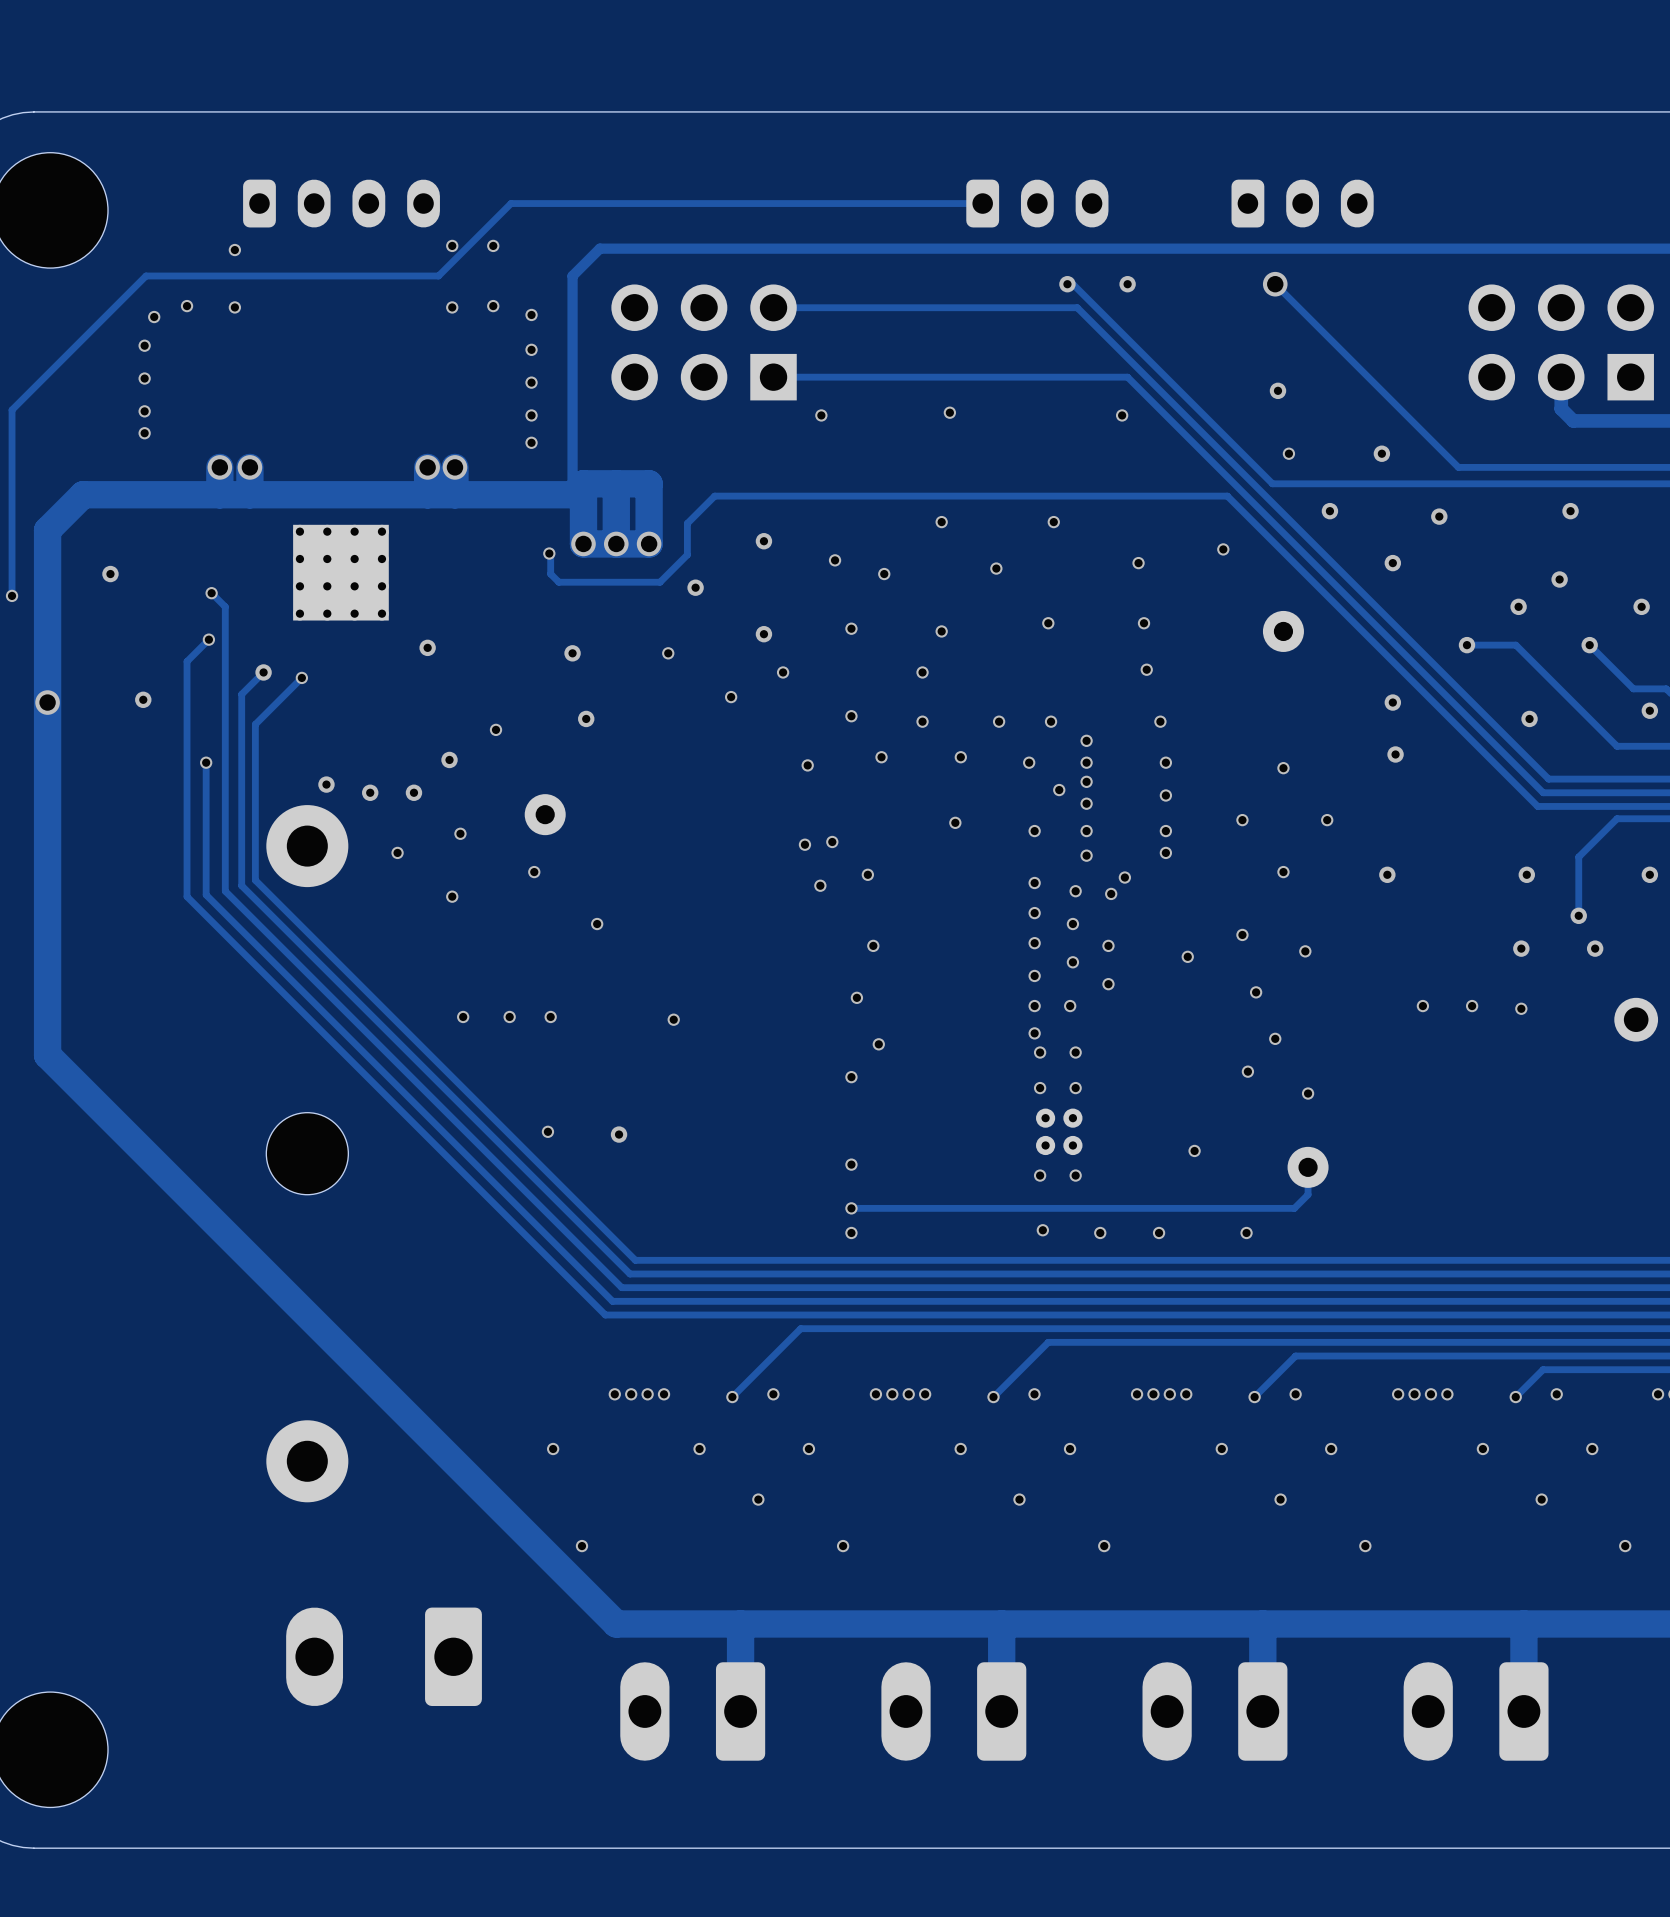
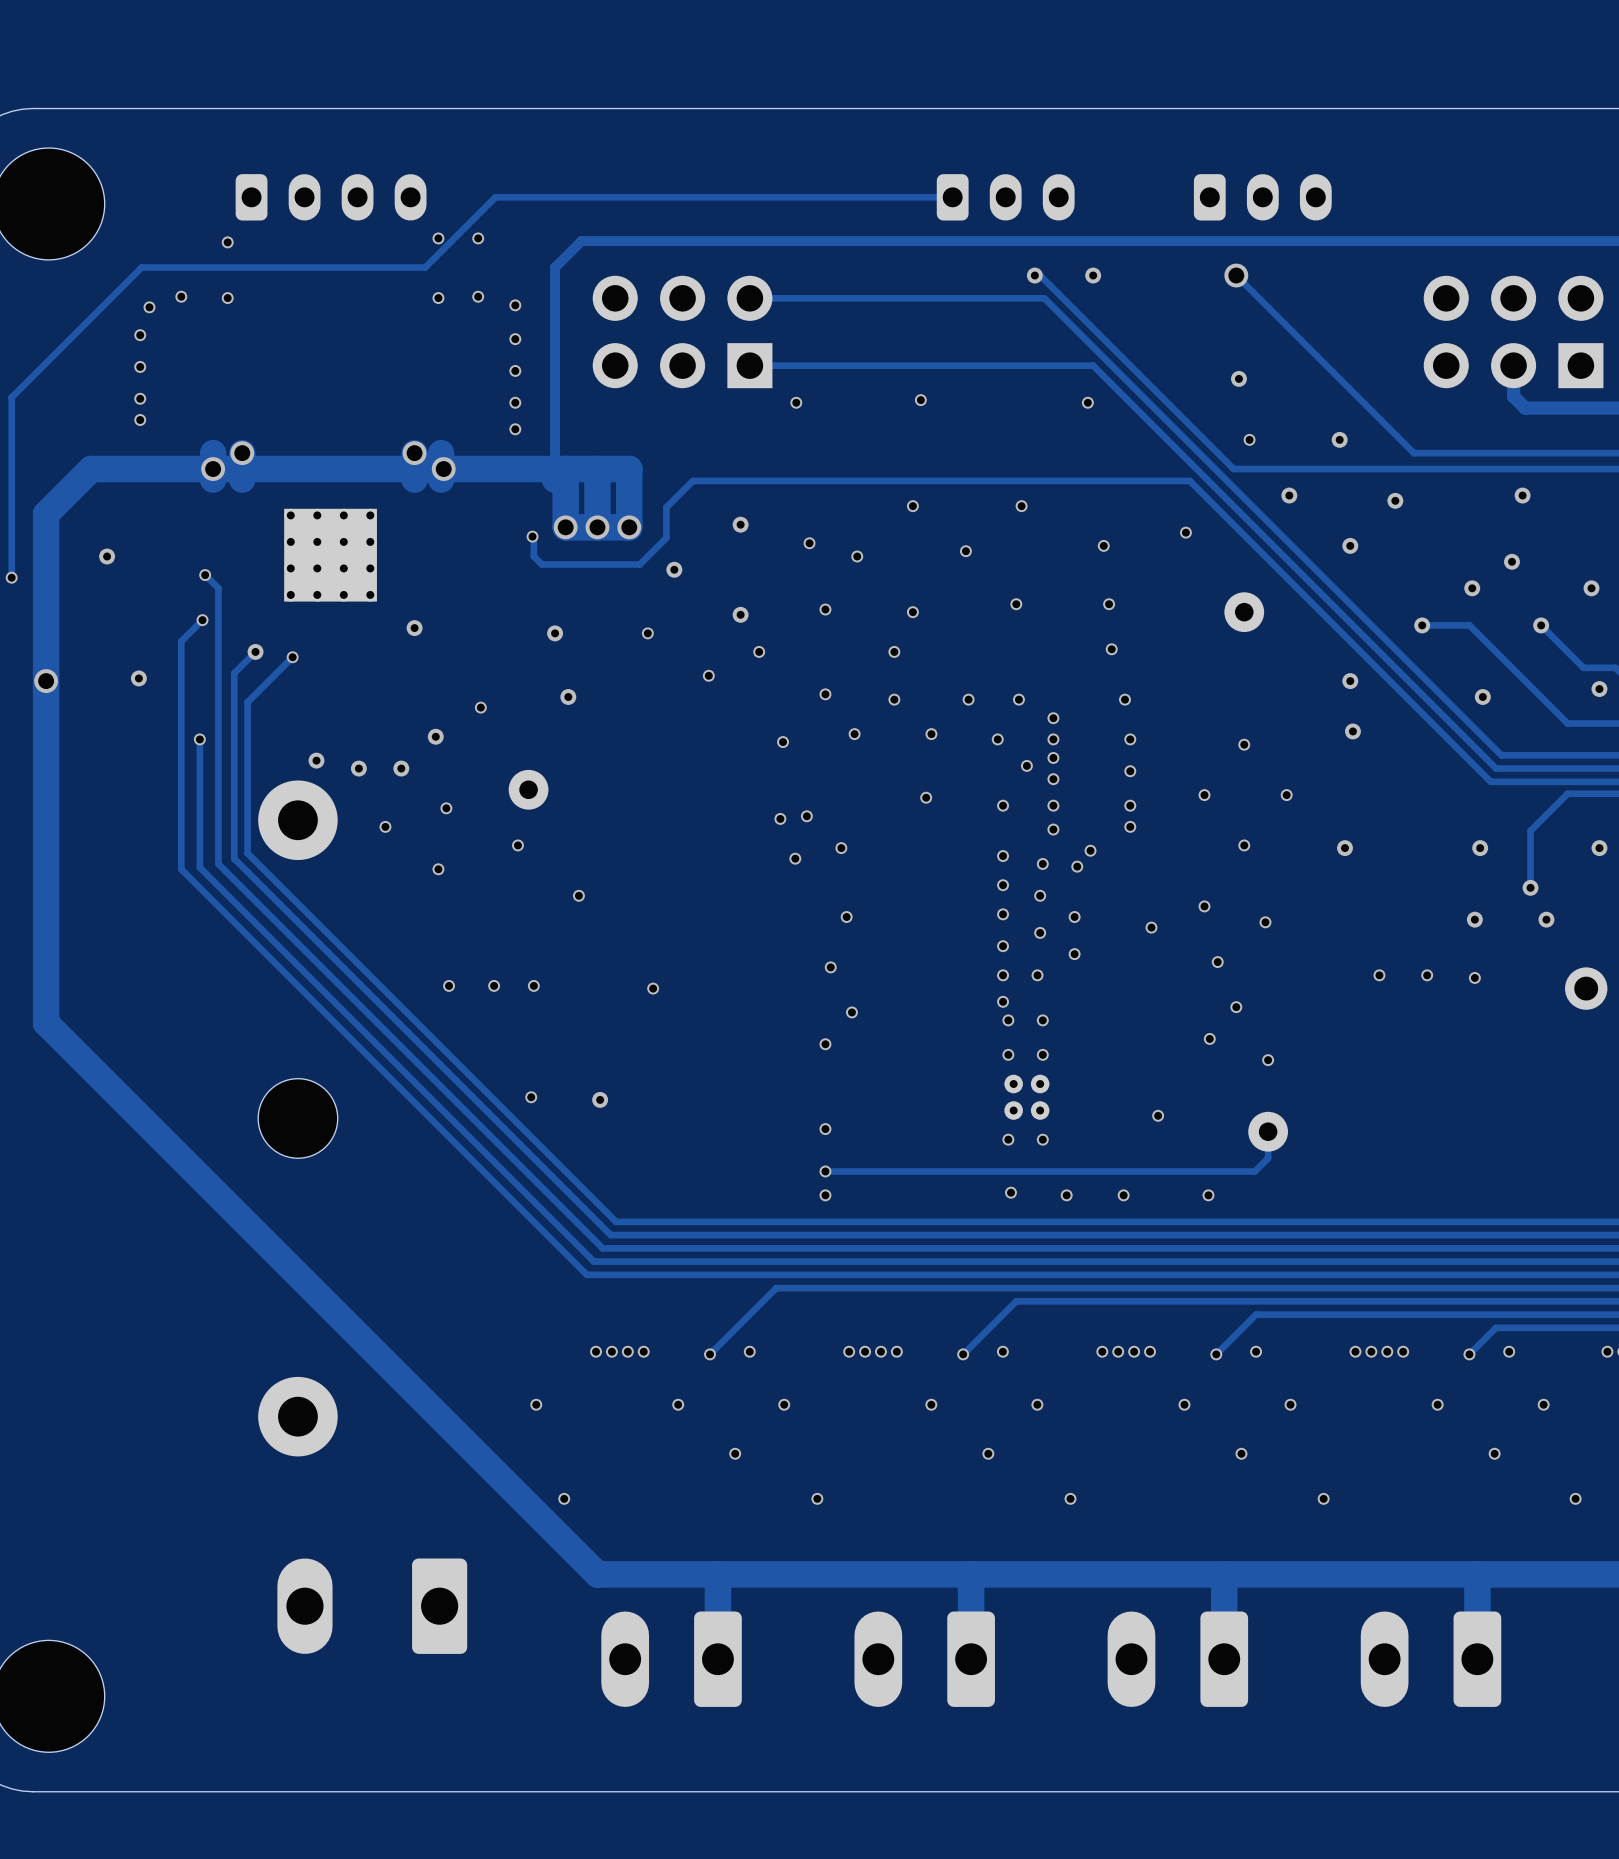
via position: (219, 467) -> (213, 469)
via position: (454, 467) -> (443, 469)
track: (572, 494) (83, 494) -> (565, 469) (91, 469) (80, 479)

